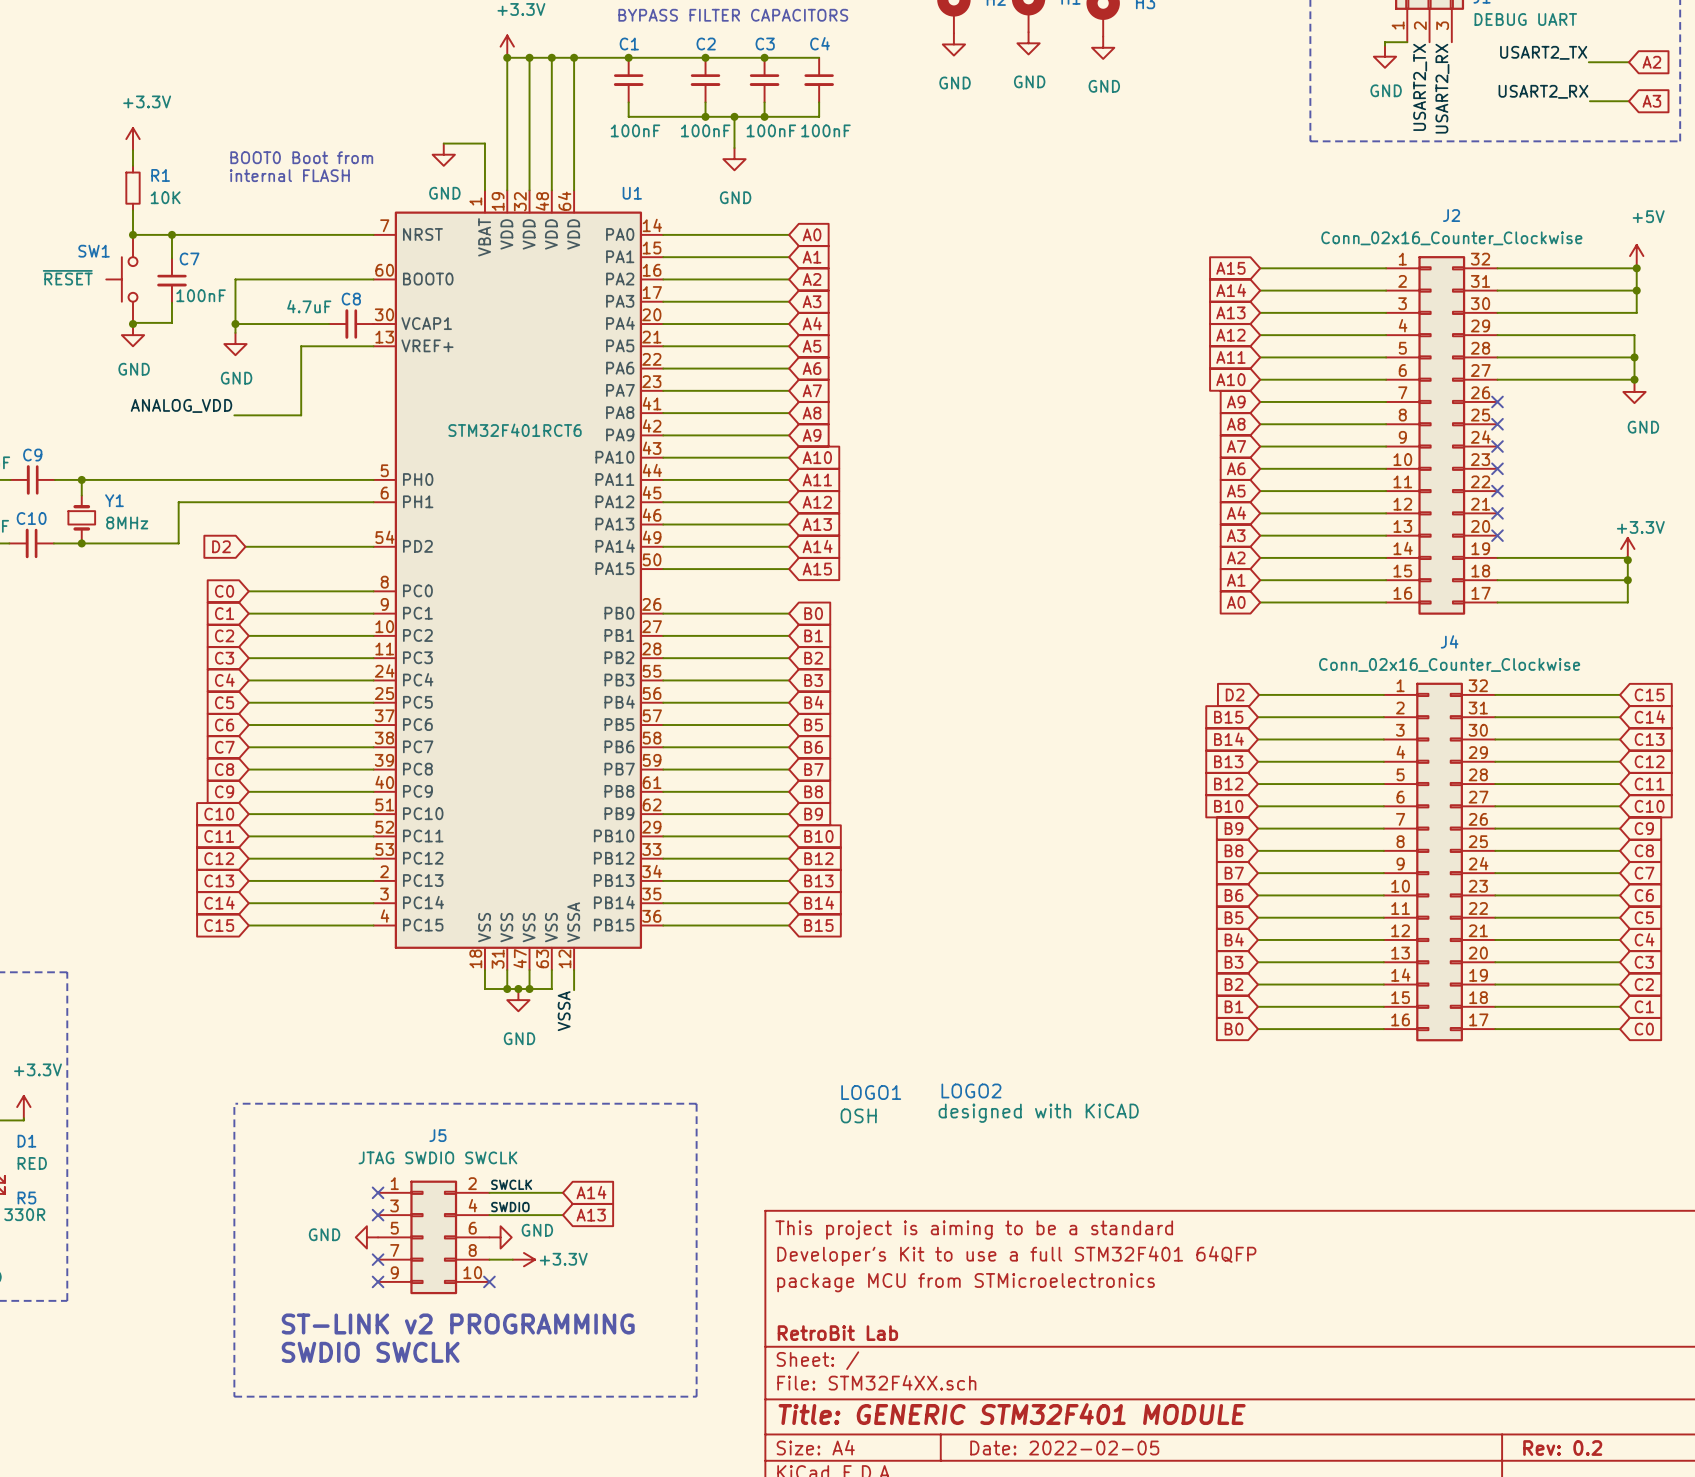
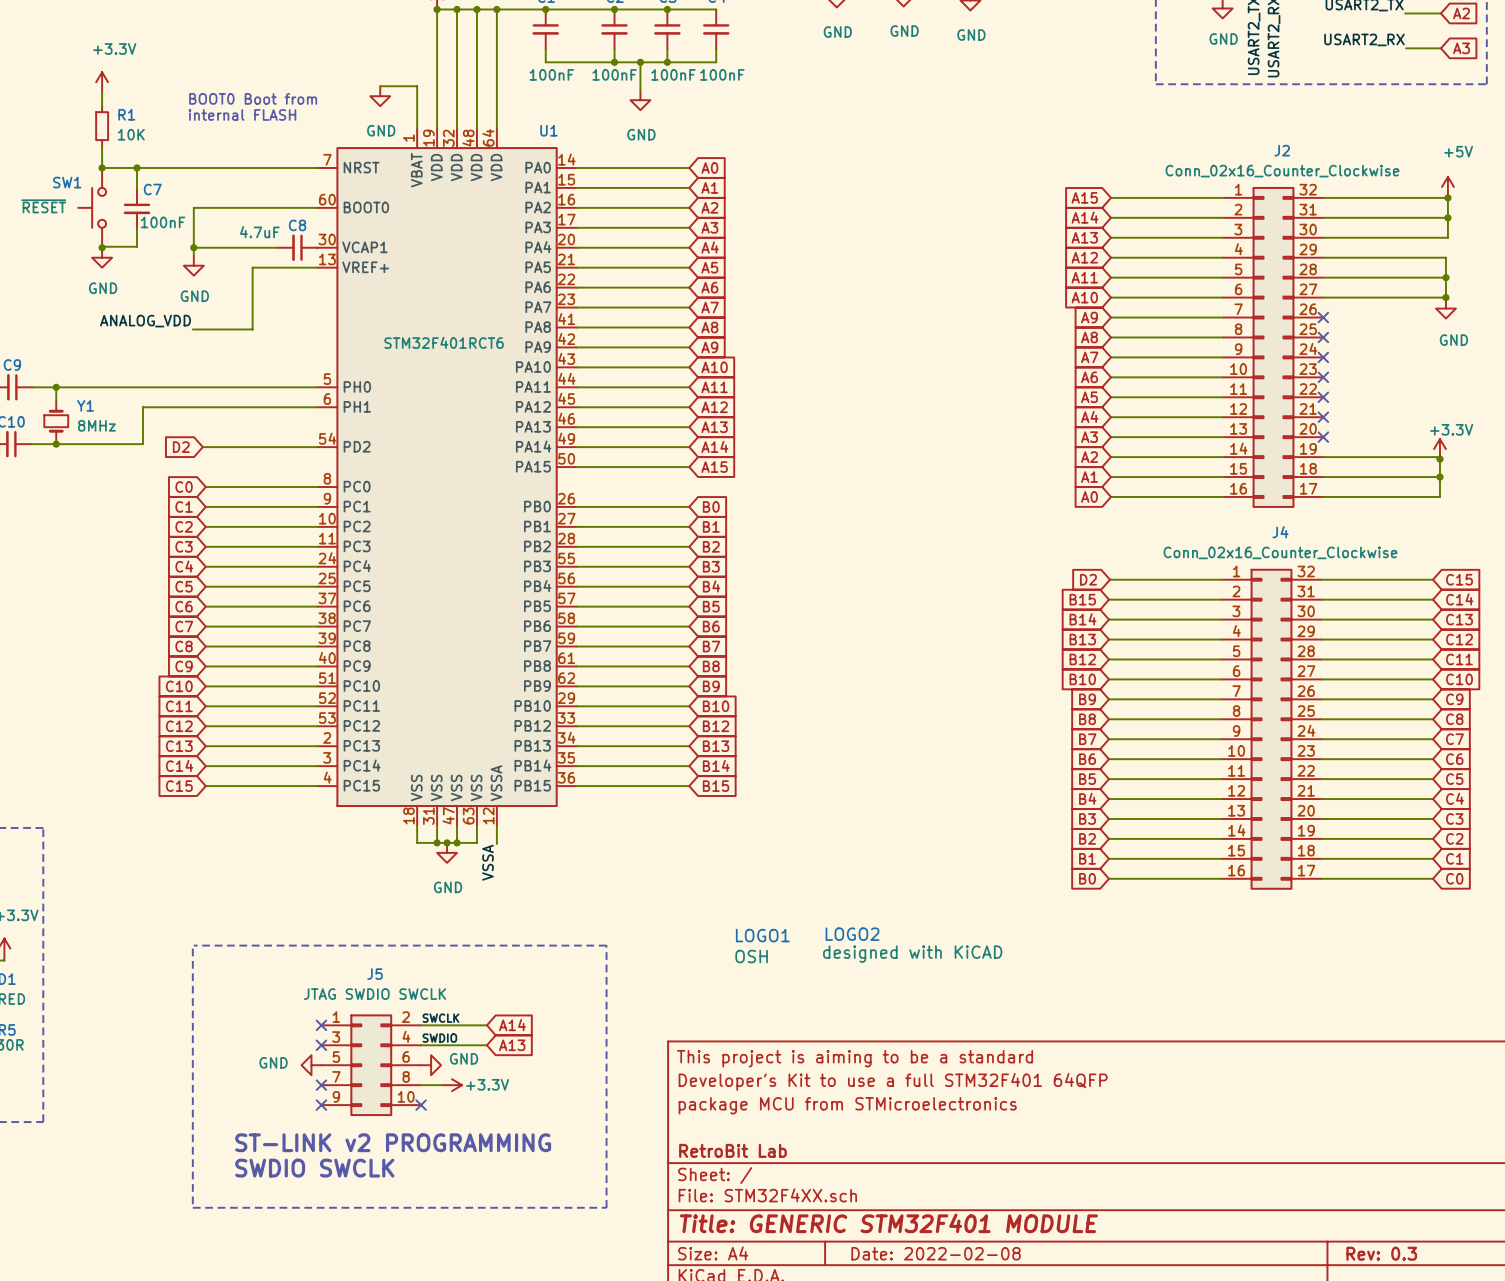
title block: Date: 2022-02-05 (1064, 1448) -> Date: 2022-02-08 (936, 1253)
title block: Rev: 0.2 (1562, 1448) -> Rev: 0.3 (1381, 1253)

